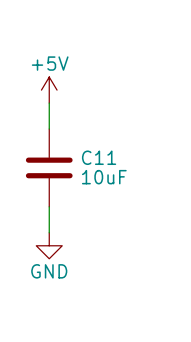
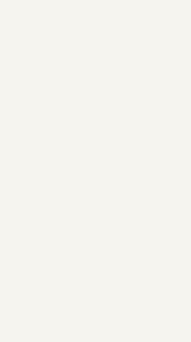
power symbol: +5V (49, 90) -> none
wire: (49, 103) (49, 129) -> none
C11: 10uF (49, 167) -> none
wire: (49, 206) (49, 232) -> none
power symbol: GND (49, 245) -> none

